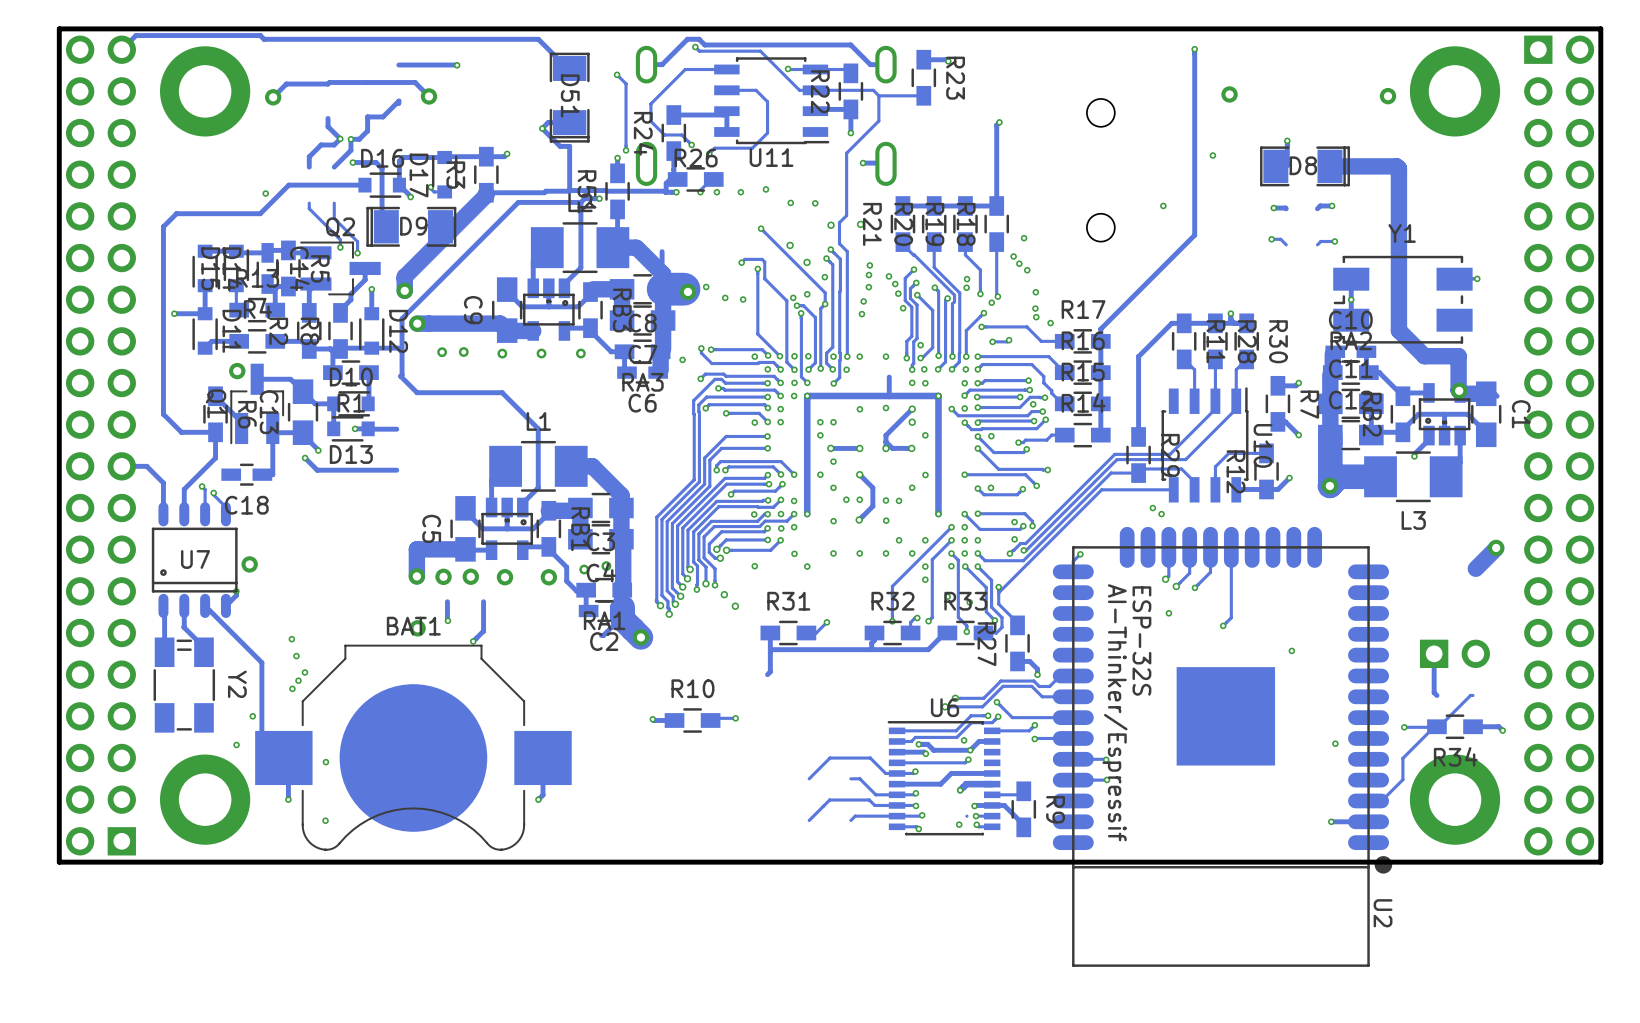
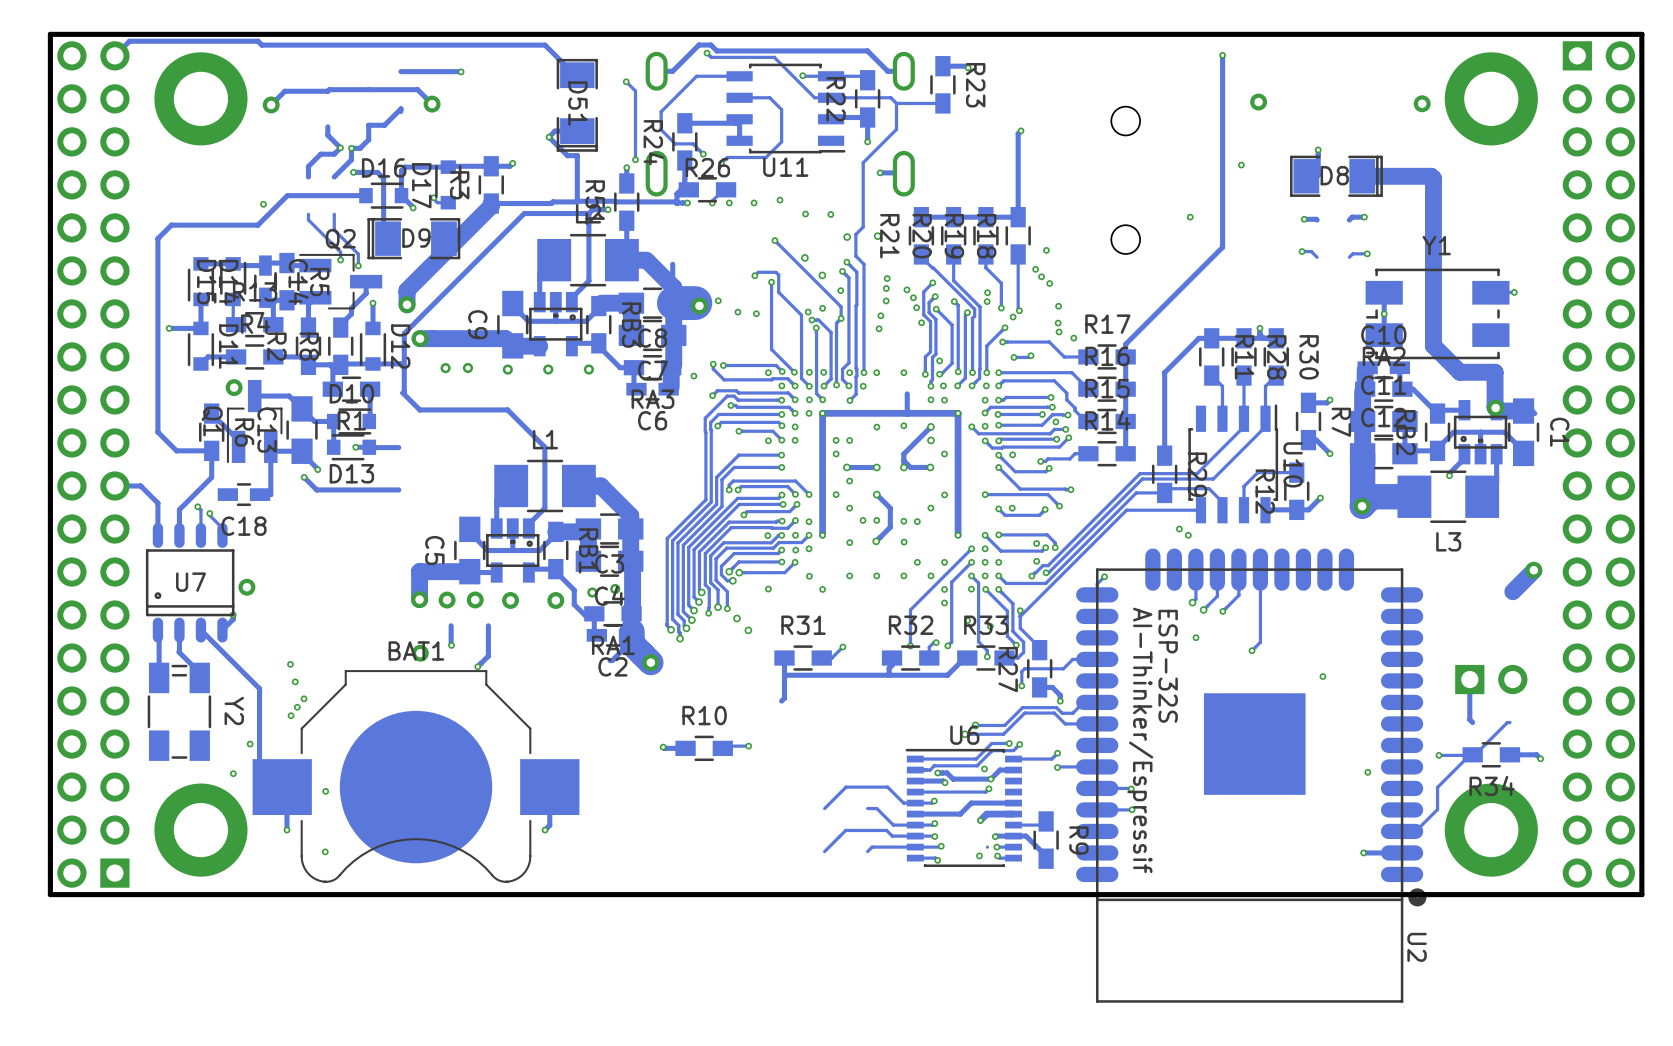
track: none -> (1097, 659) (1072, 659) (1063, 668) (1024, 668) (1021, 671) (1021, 685)
track: (996, 702) (1012, 717) (1073, 717) -> none
via position: (996, 702) -> (1021, 685)

